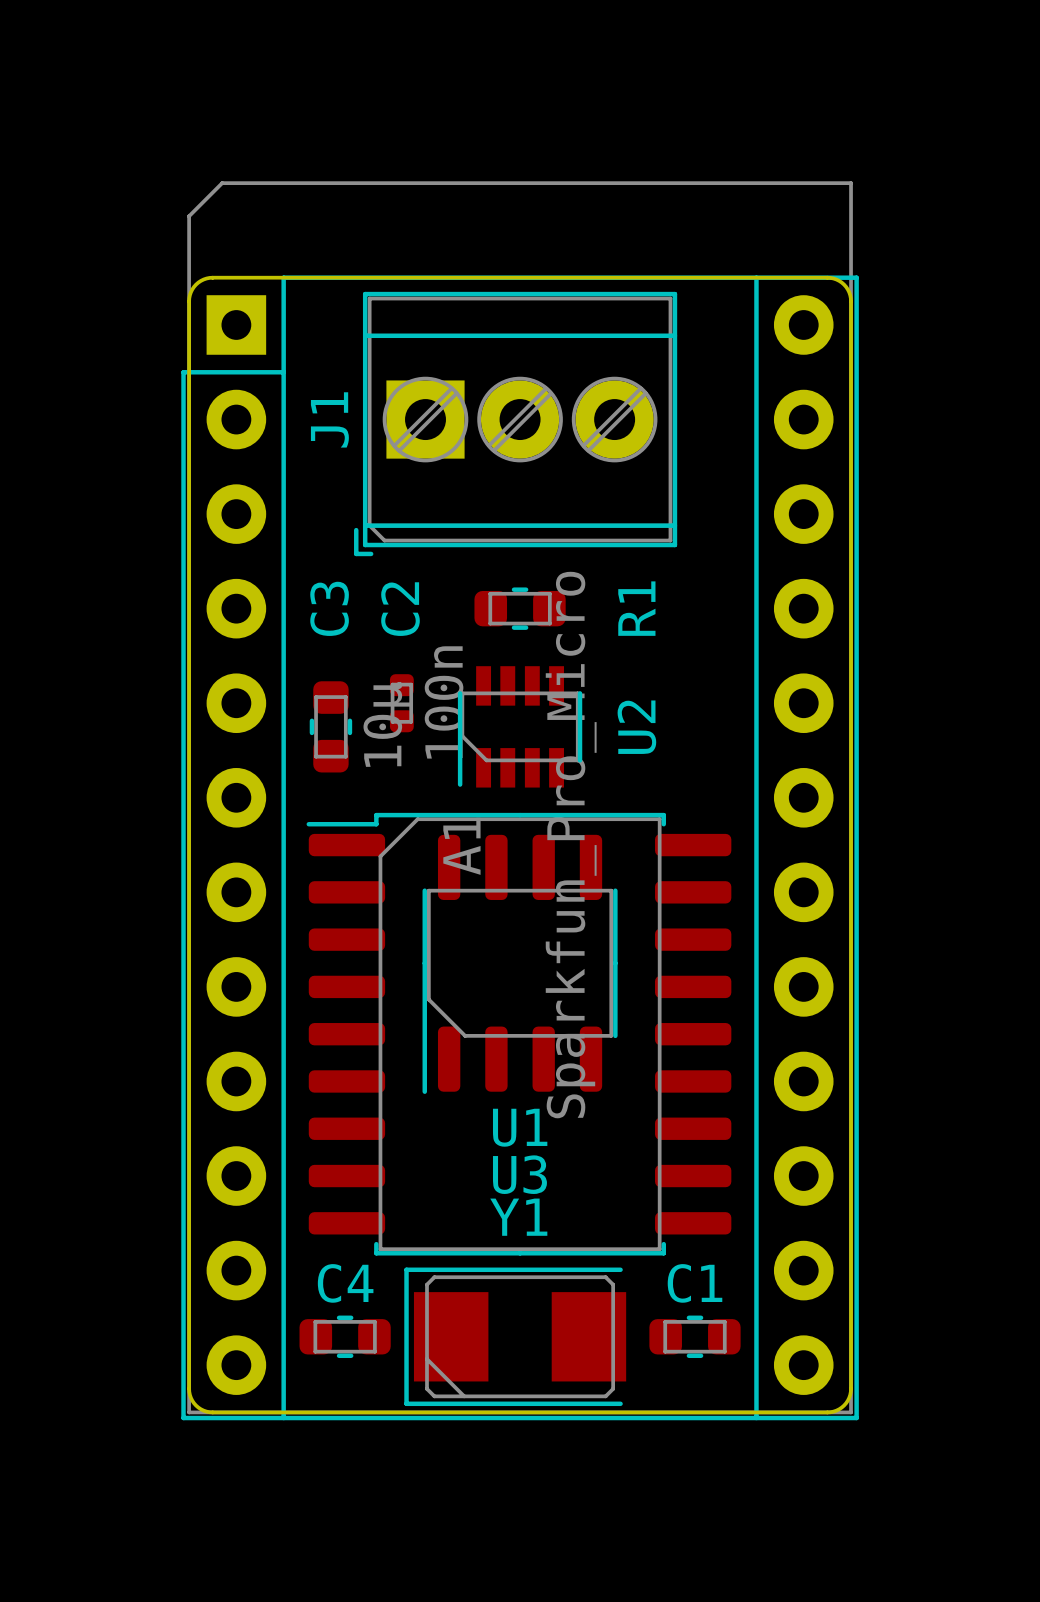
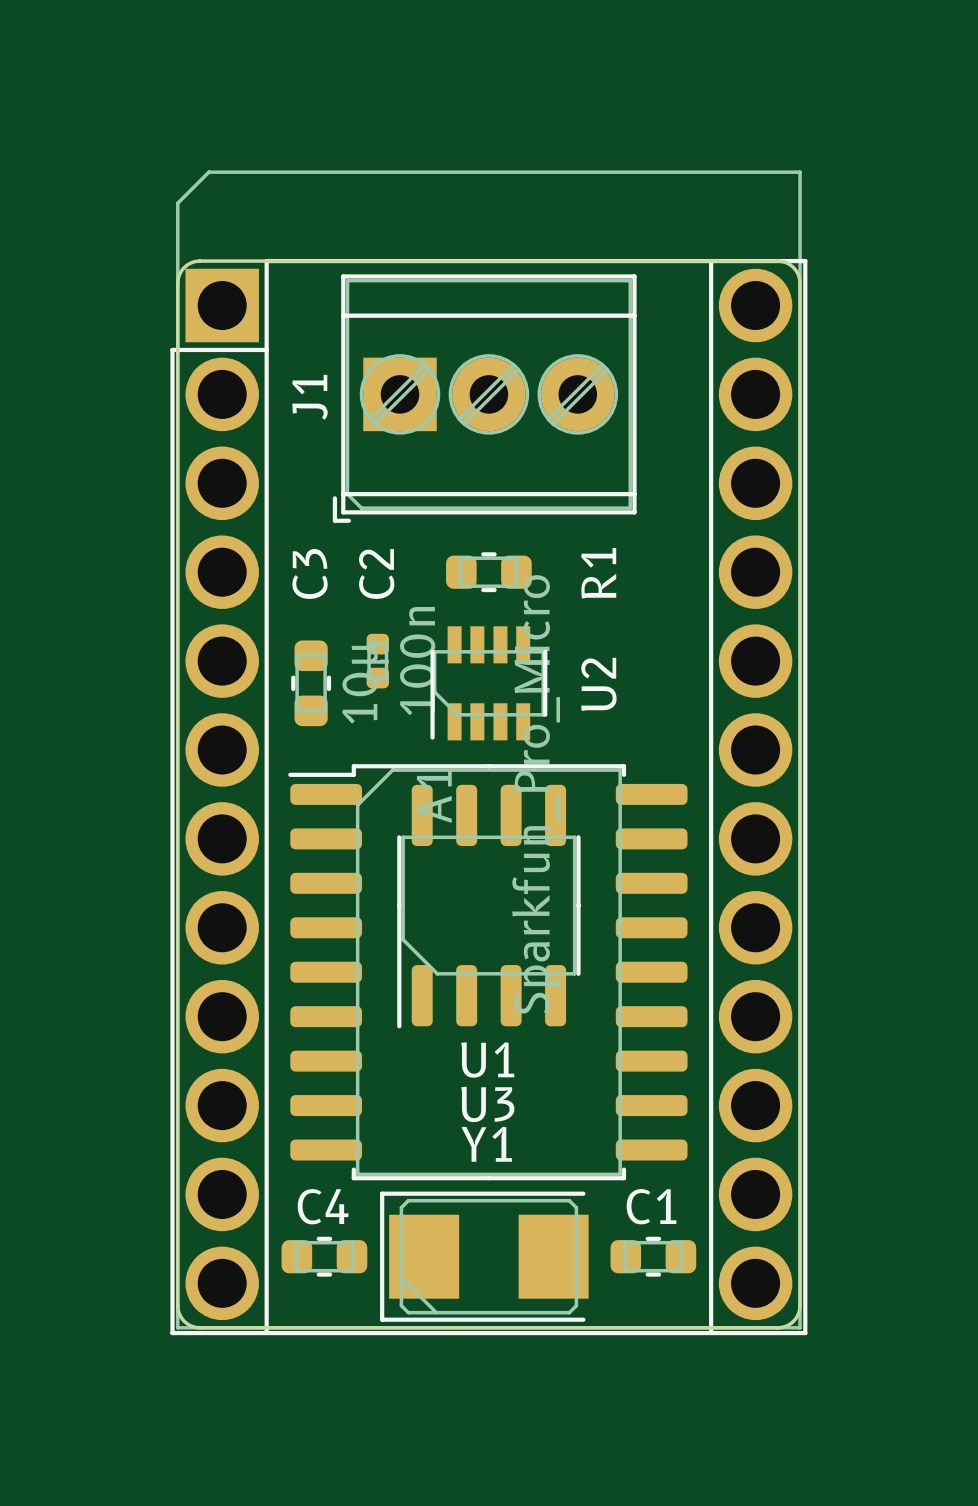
A1 footprint: [181, 181, 859, 1421] -> [170, 170, 808, 1336]

